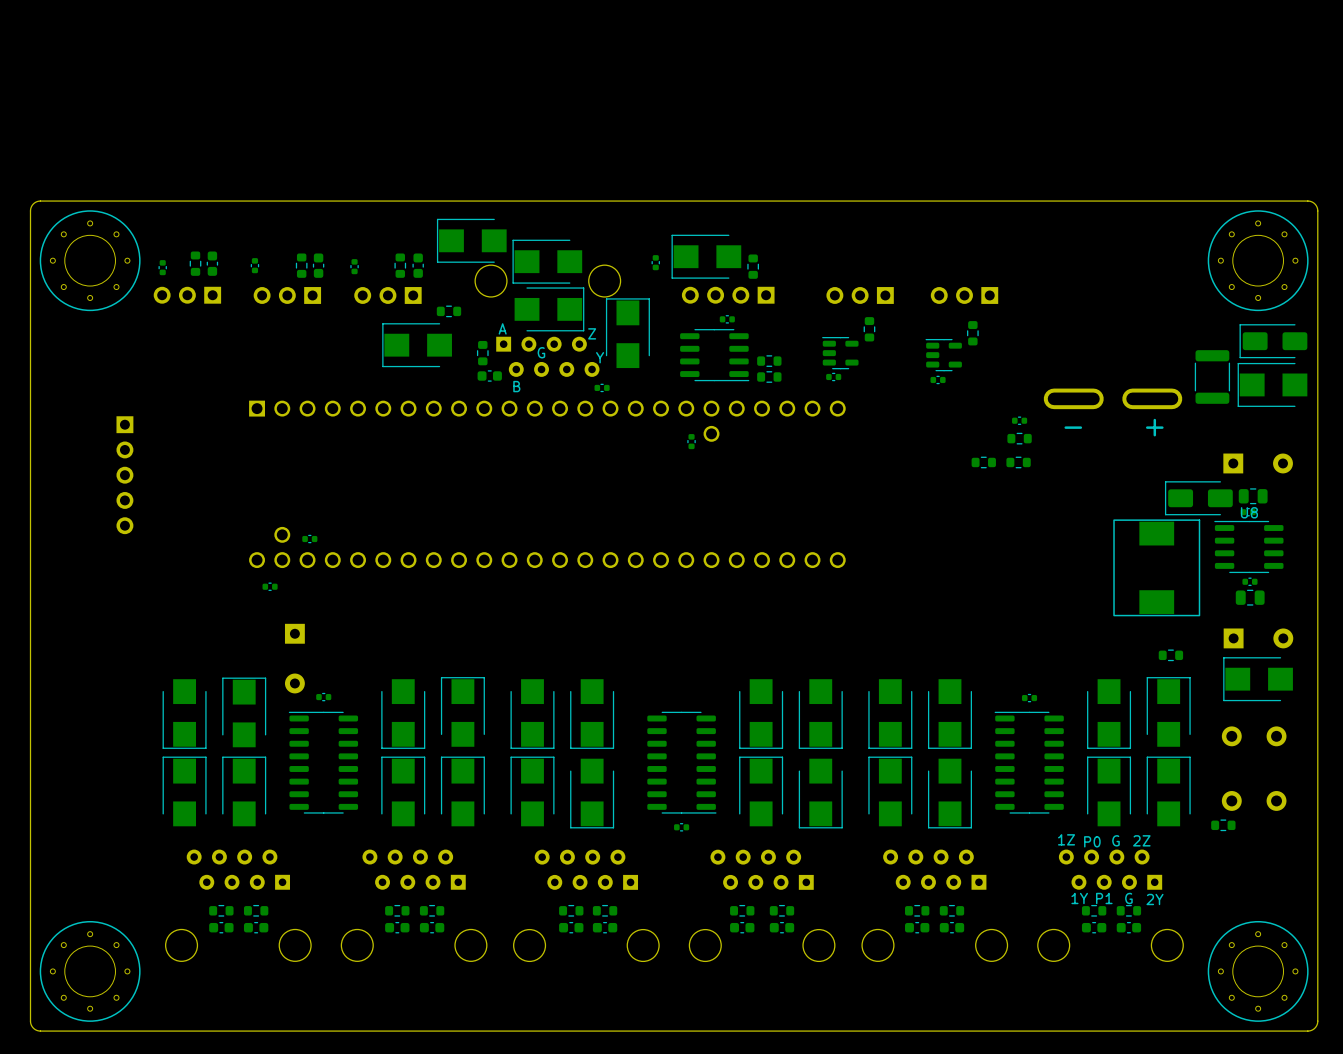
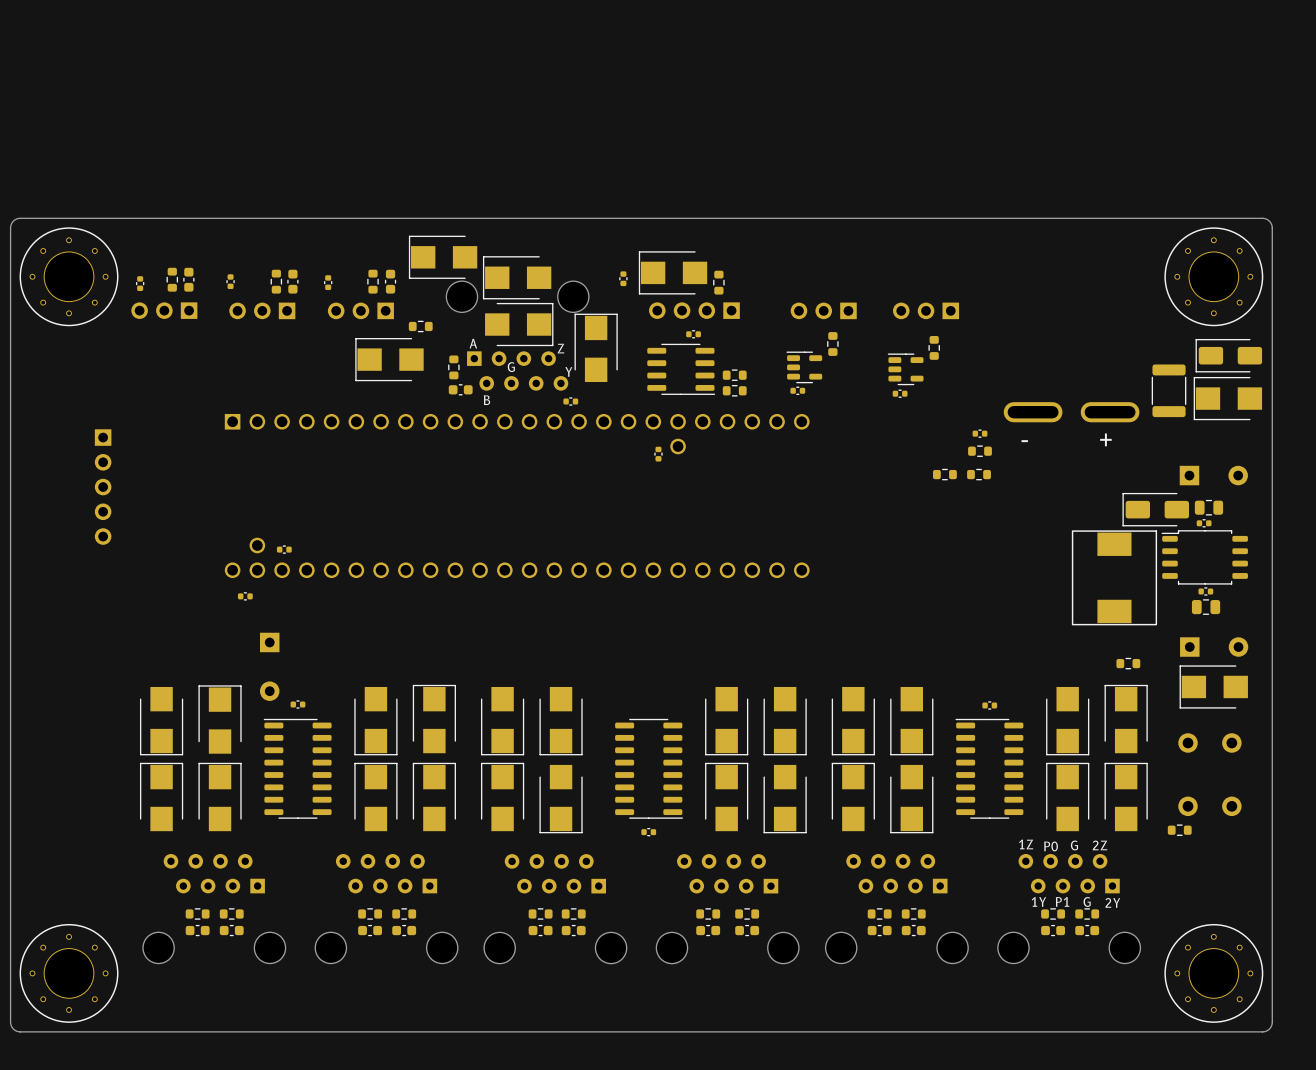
U8: (1248, 546) -> none
part: none -> (1204, 557)

